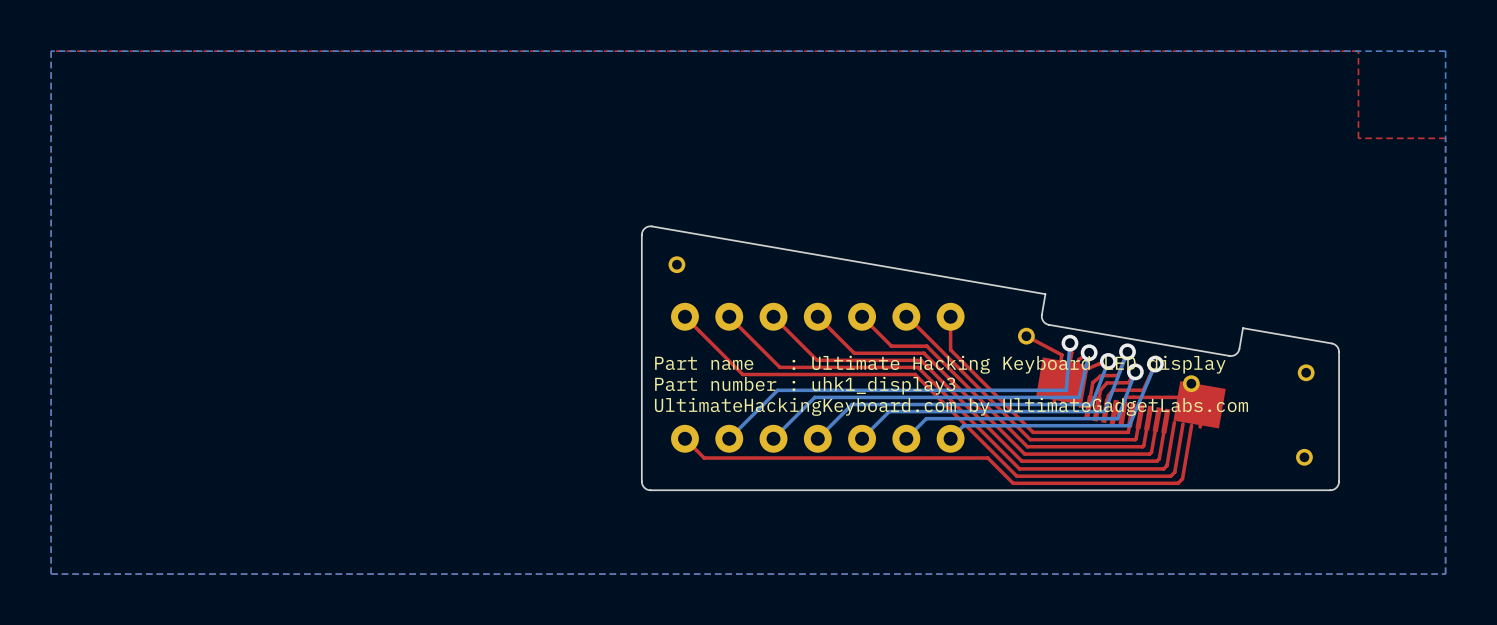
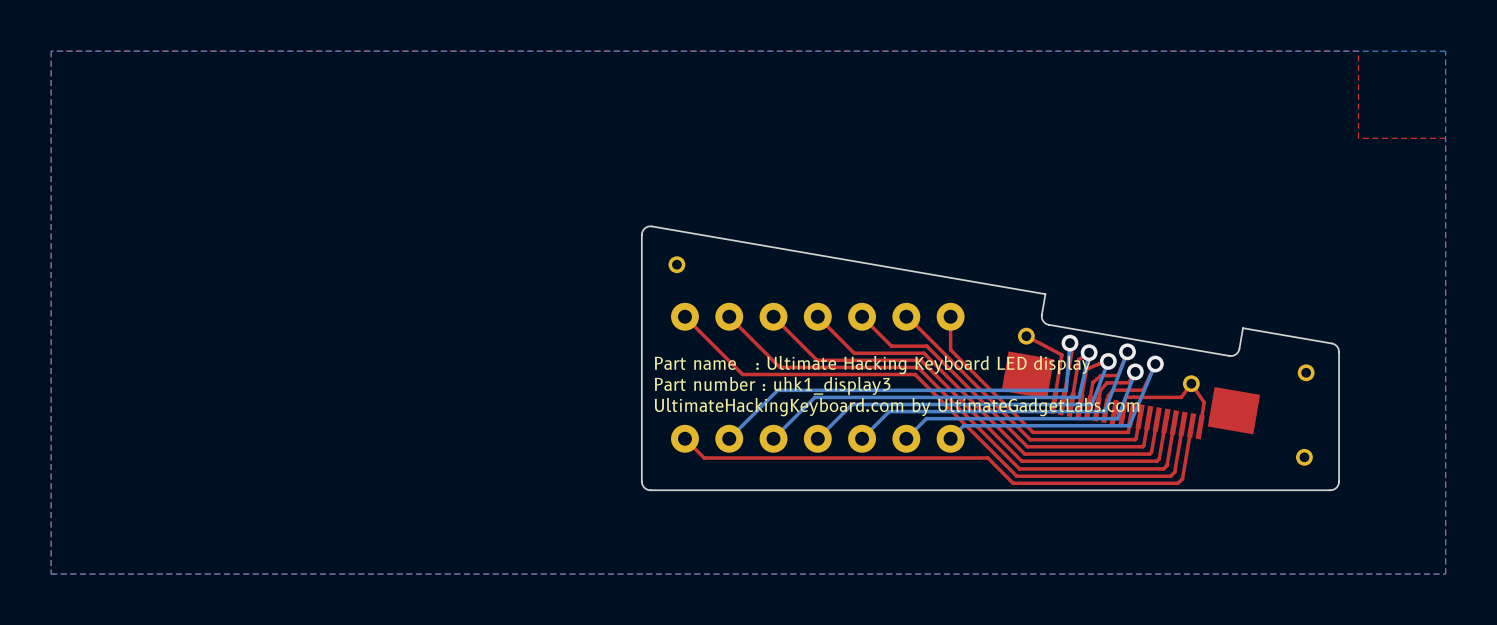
part footprint: [1036, 357, 1226, 434] -> [1001, 351, 1261, 440]

